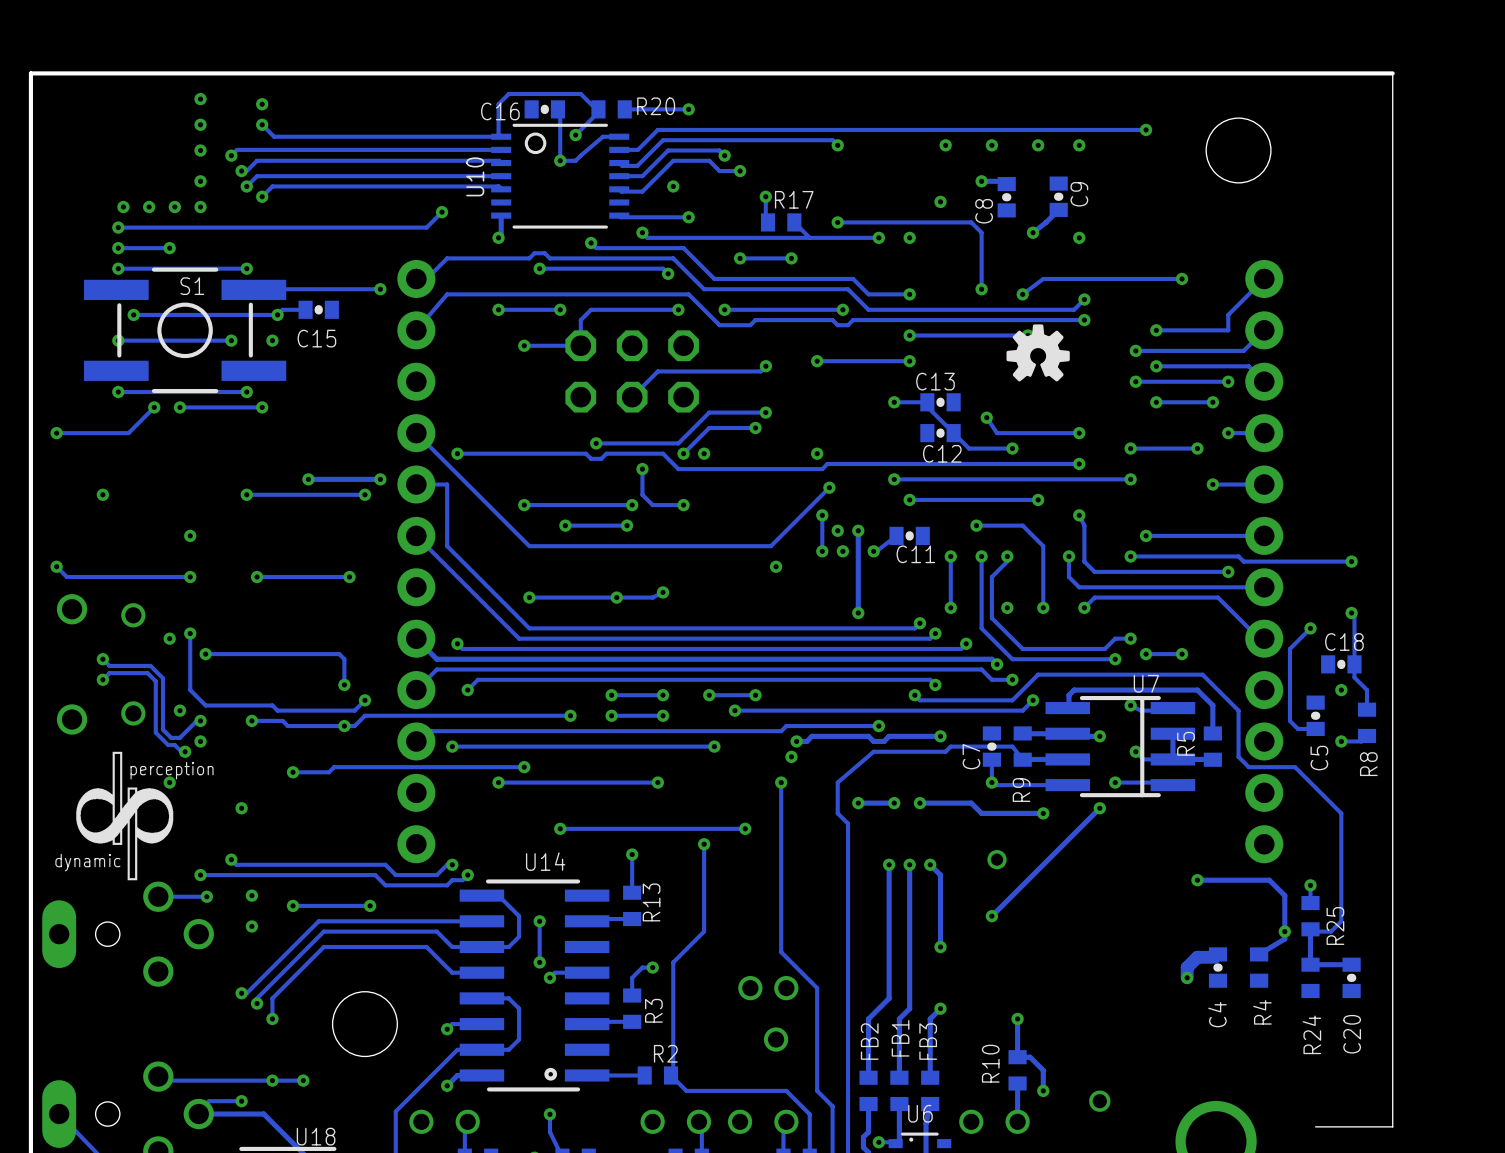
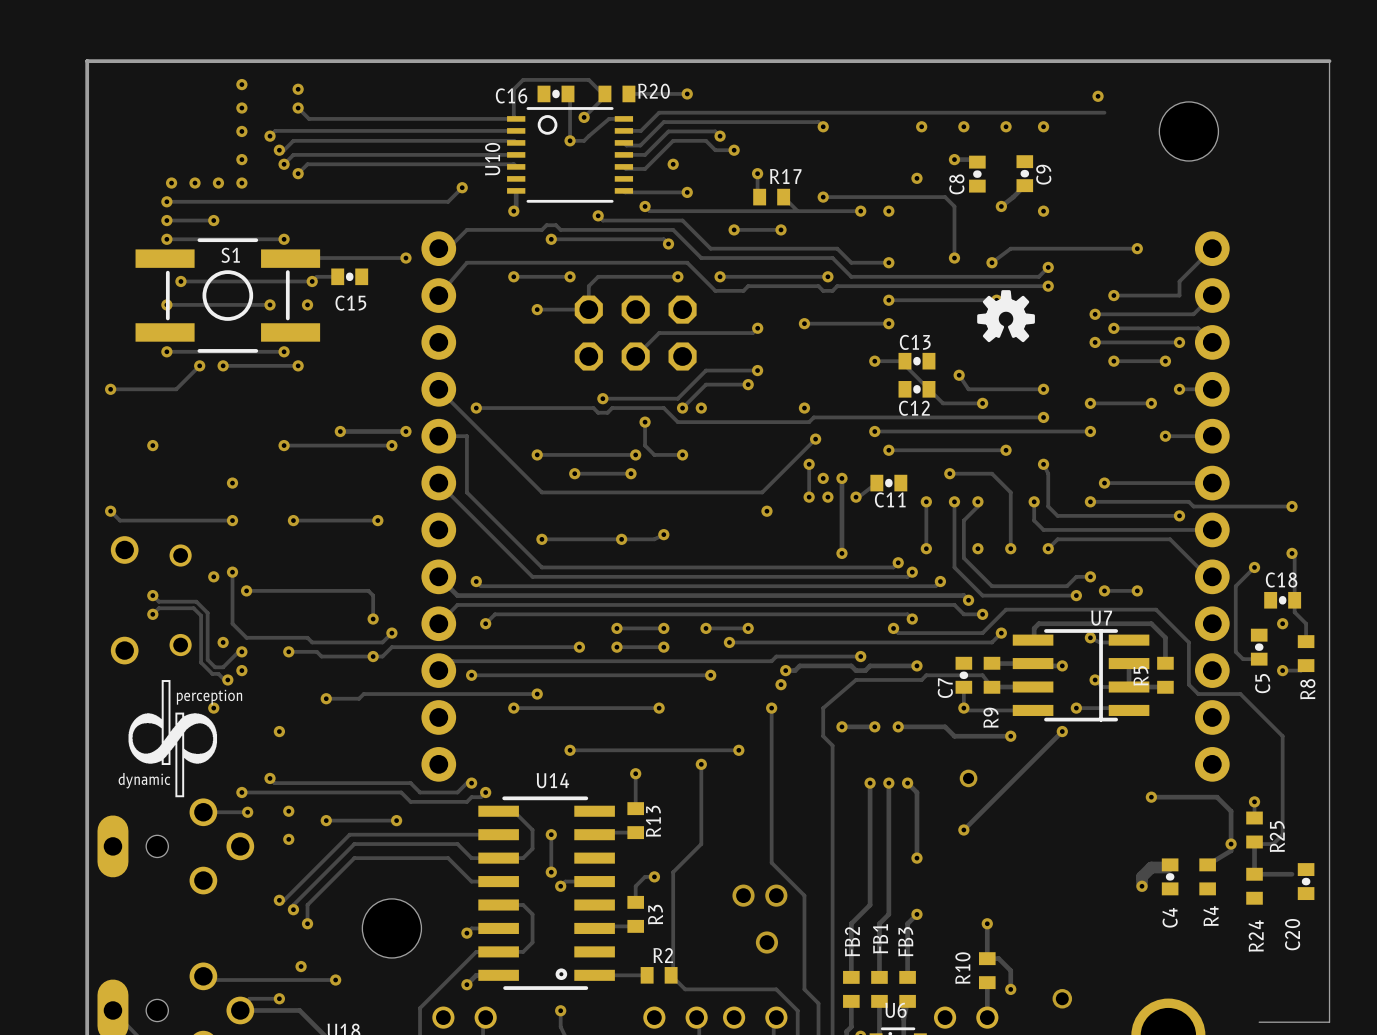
via position: (1146, 129) -> (1098, 96)
C20 position: (1351, 977) -> (1306, 881)
via position: (272, 1080) -> (301, 966)

